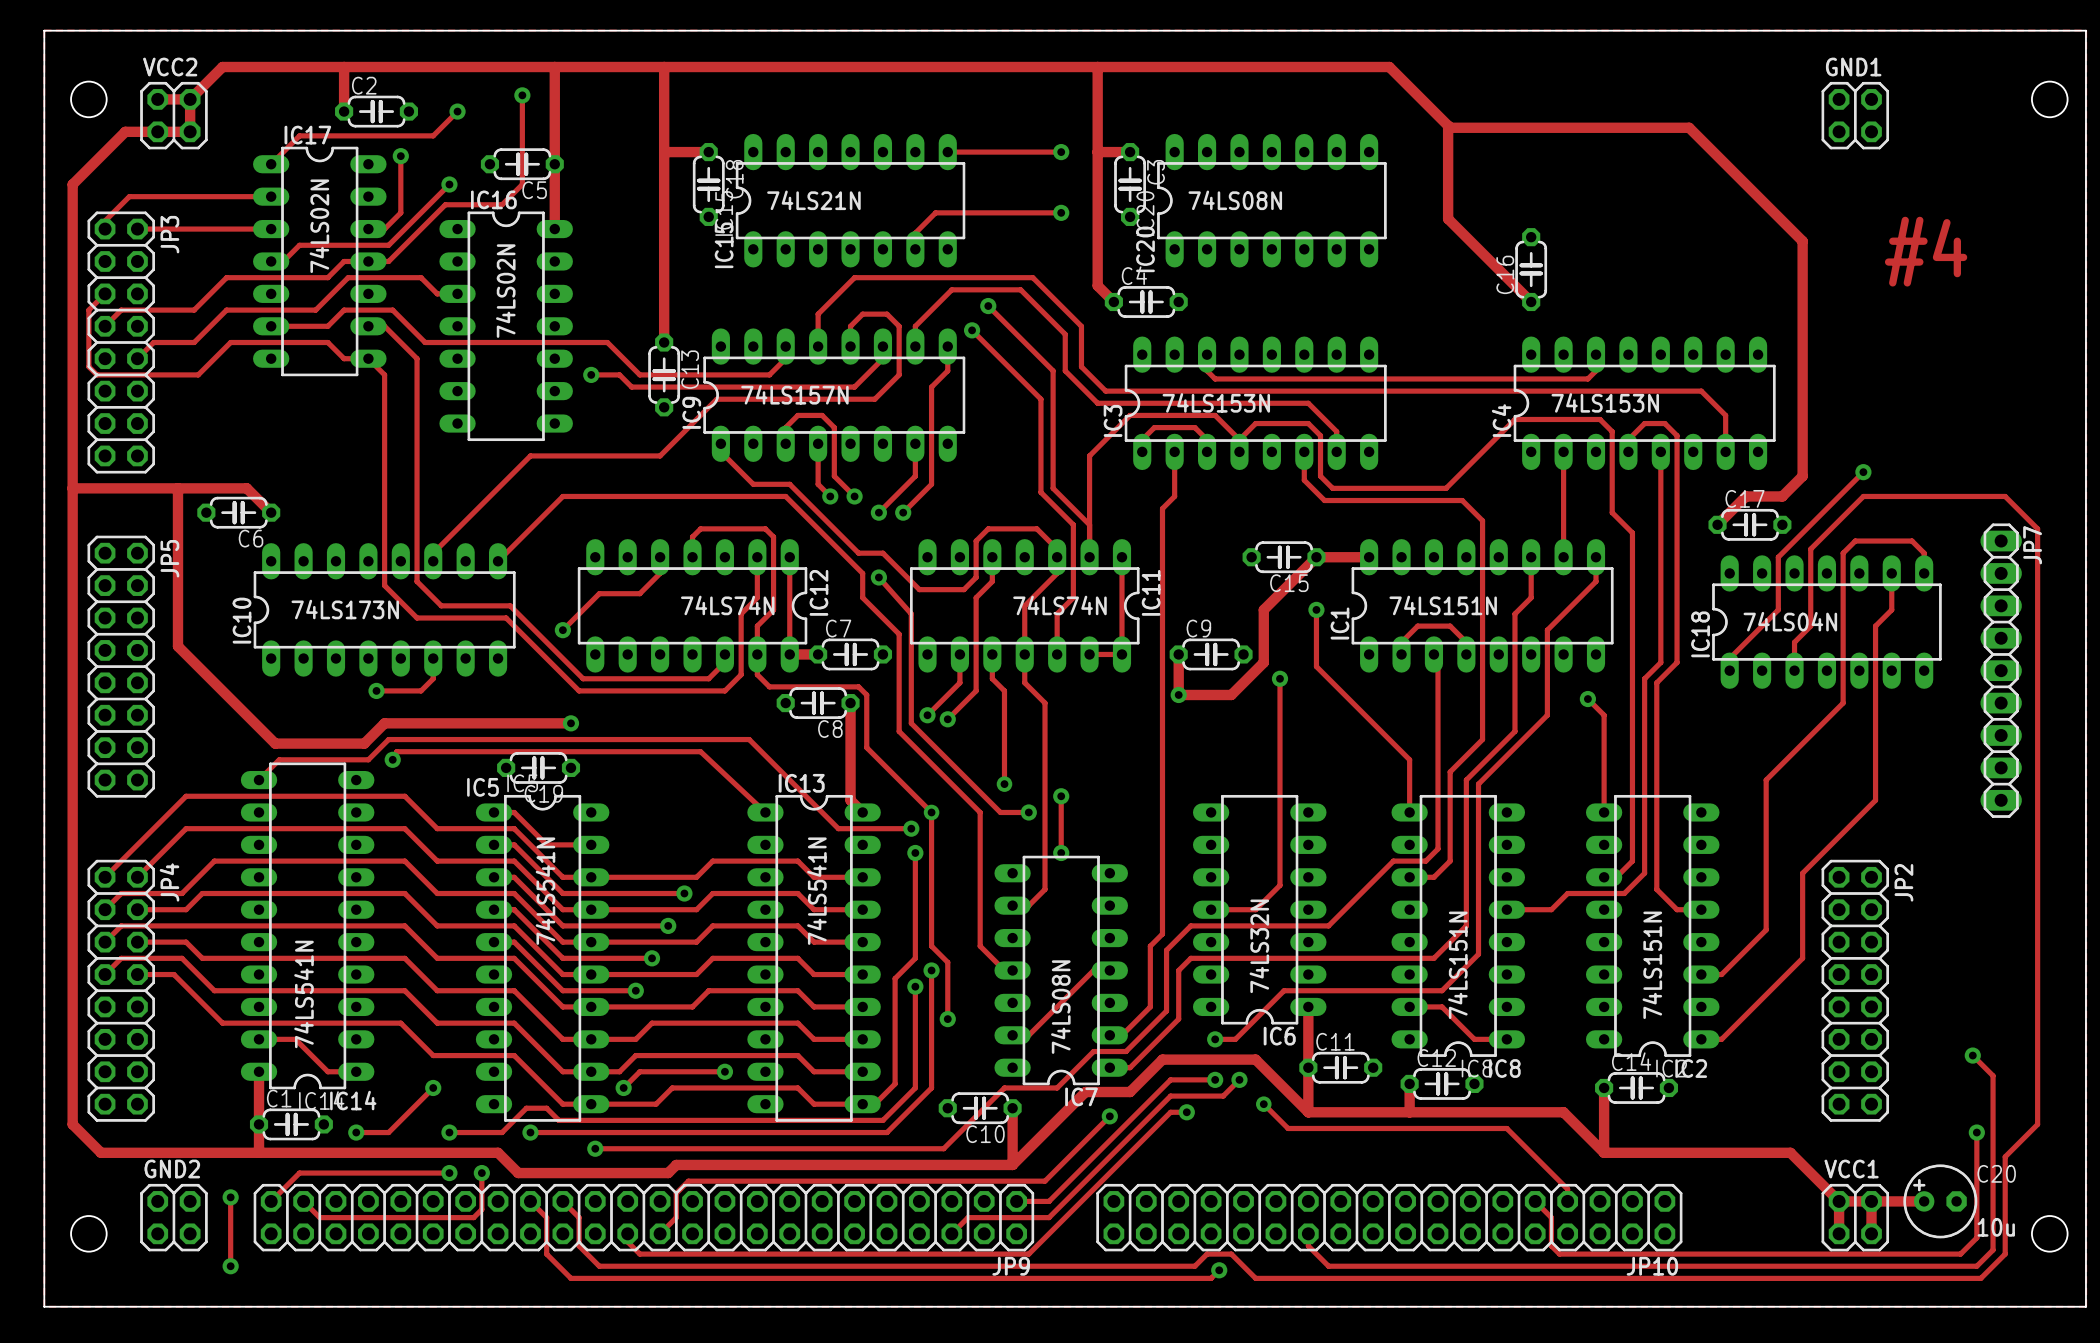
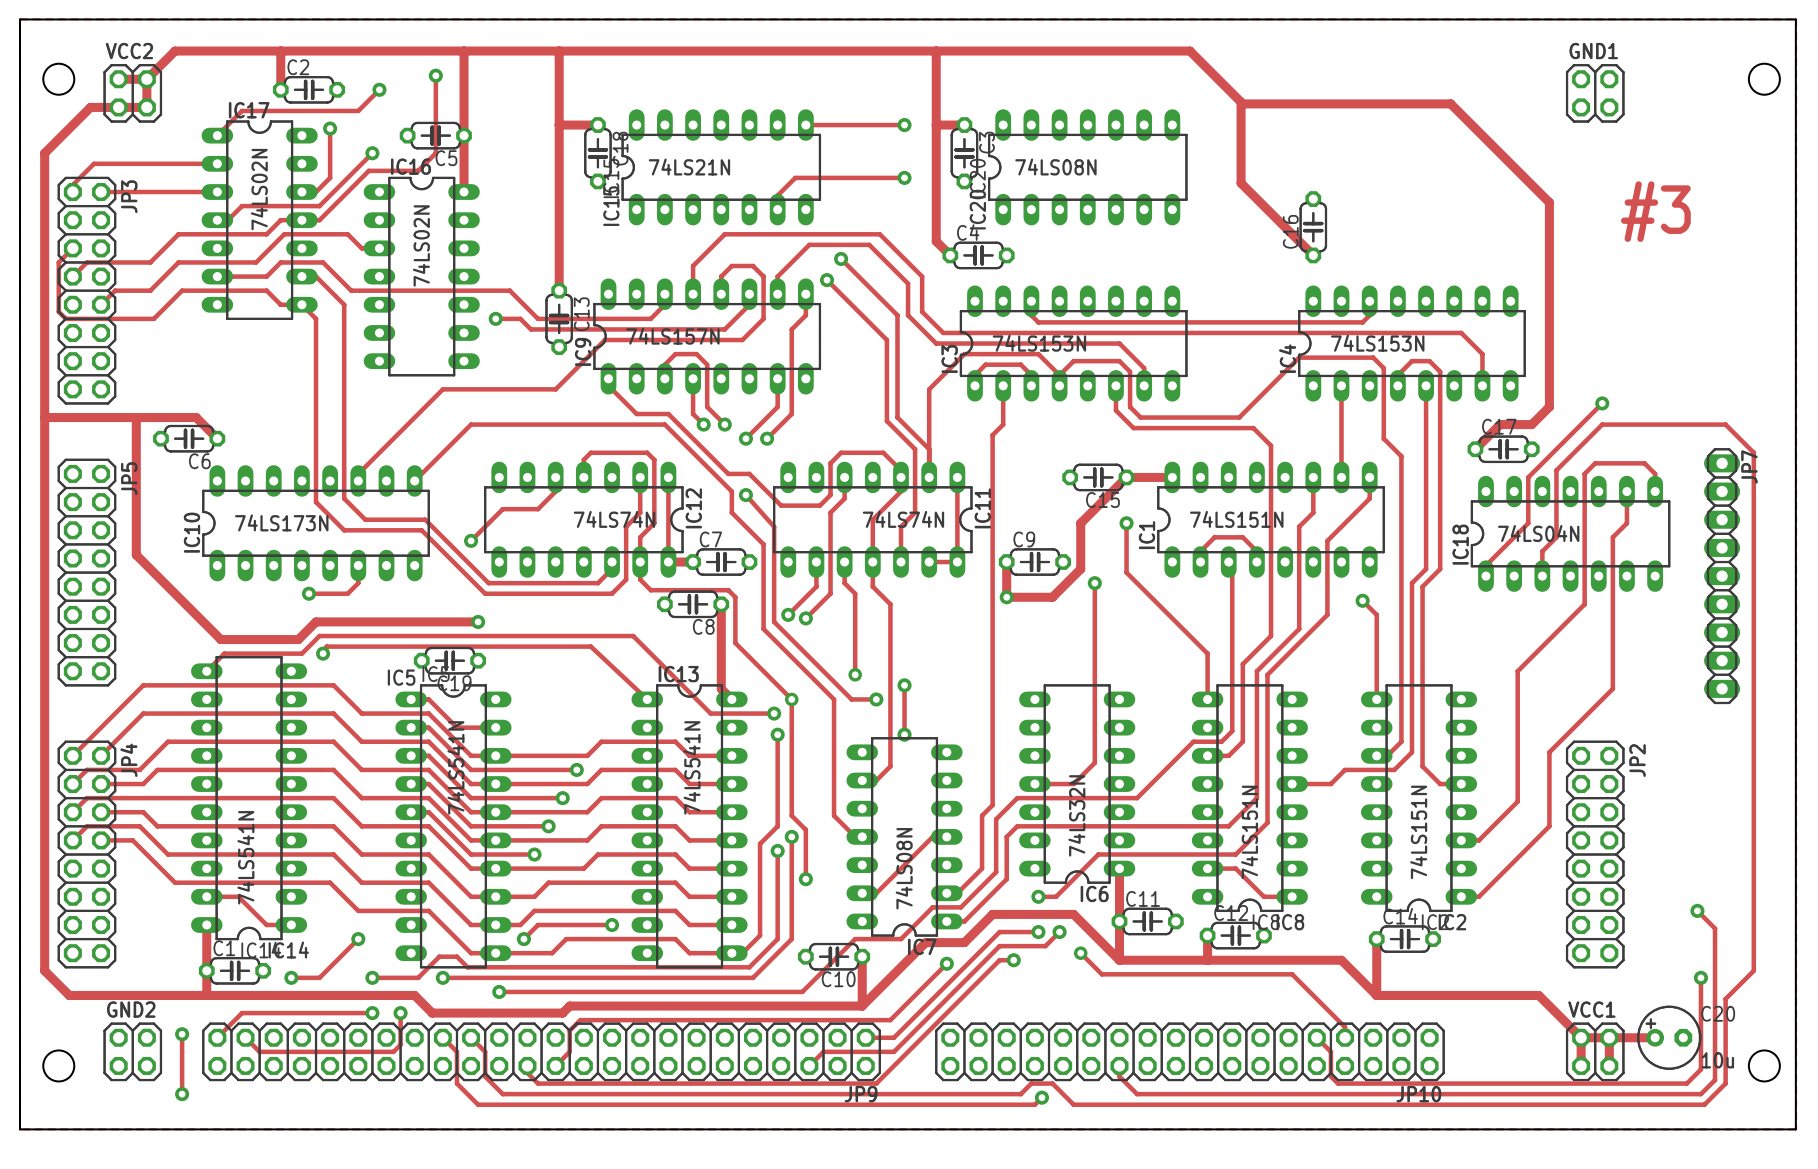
text: #4 (1926, 251) -> #3 (1655, 211)

